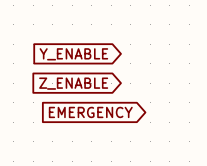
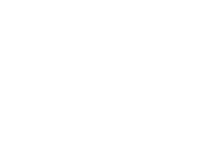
global label: Y_ENABLE (73, 54) -> none
global label: Z_ENABLE (73, 83) -> none
global label: EMERGENCY (90, 112) -> none

